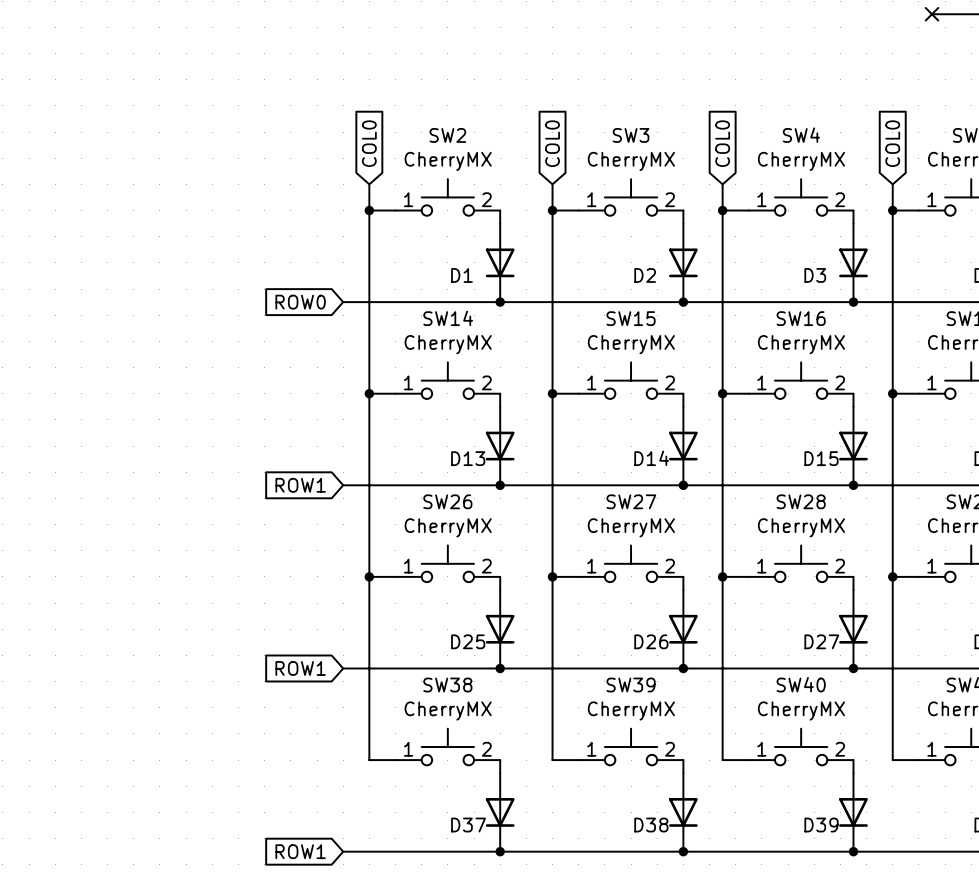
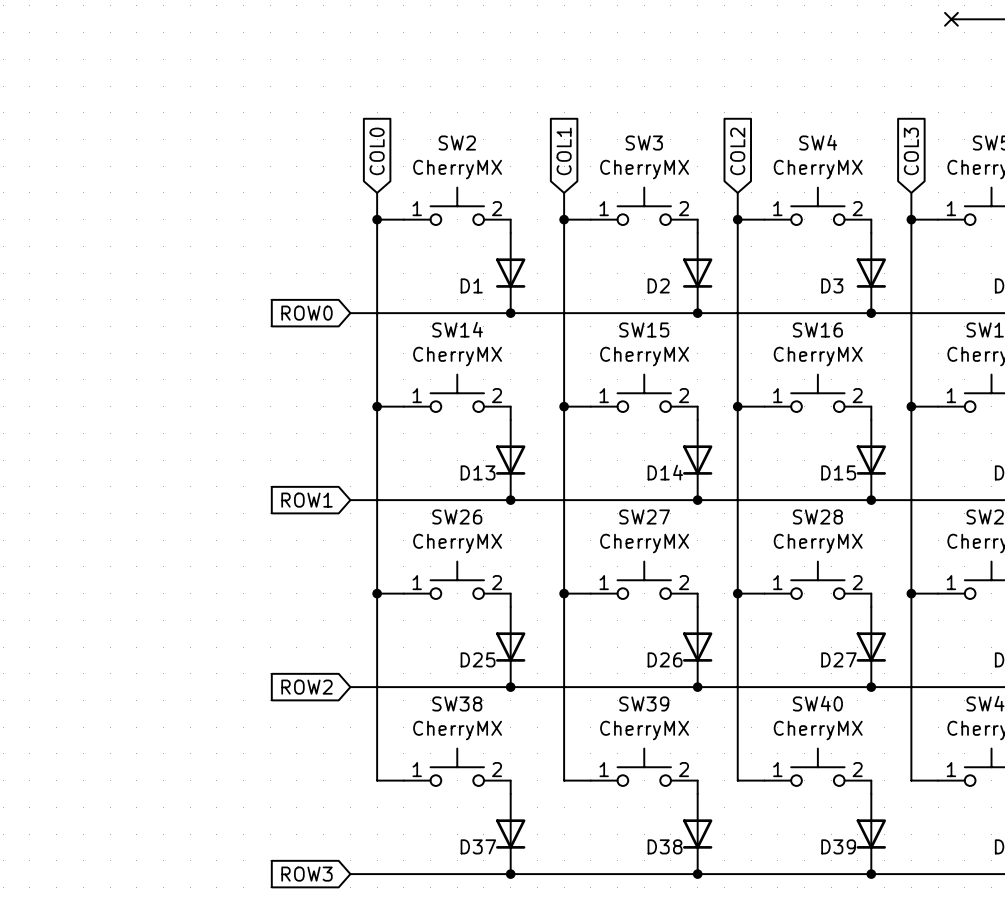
global label: COL0 (552, 143) -> COL1 (564, 151)
global label: COL0 (722, 143) -> COL2 (737, 151)
global label: COL0 (892, 143) -> COL3 (911, 151)
global label: ROW1 (300, 668) -> ROW2 (306, 687)
global label: ROW1 (300, 851) -> ROW3 (306, 874)

